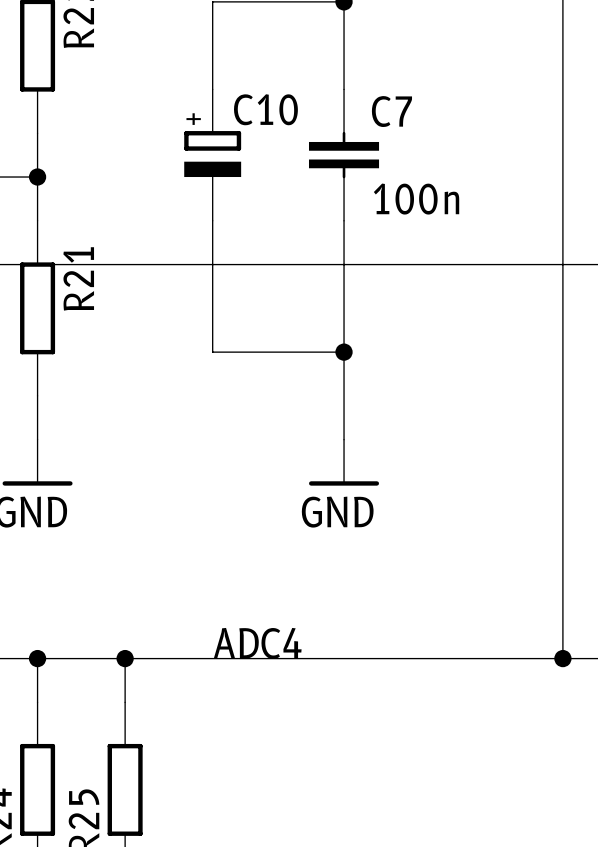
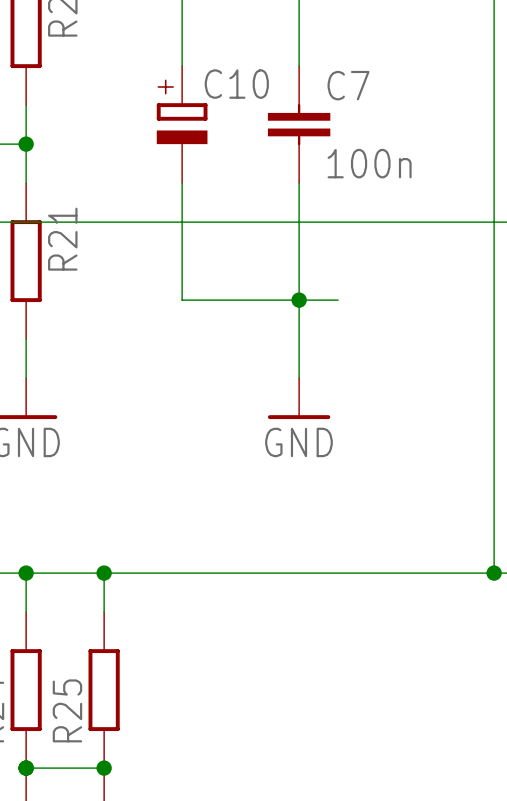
wire: none -> (299, 300) (338, 300)
label: ADC4 (257, 643) -> none

